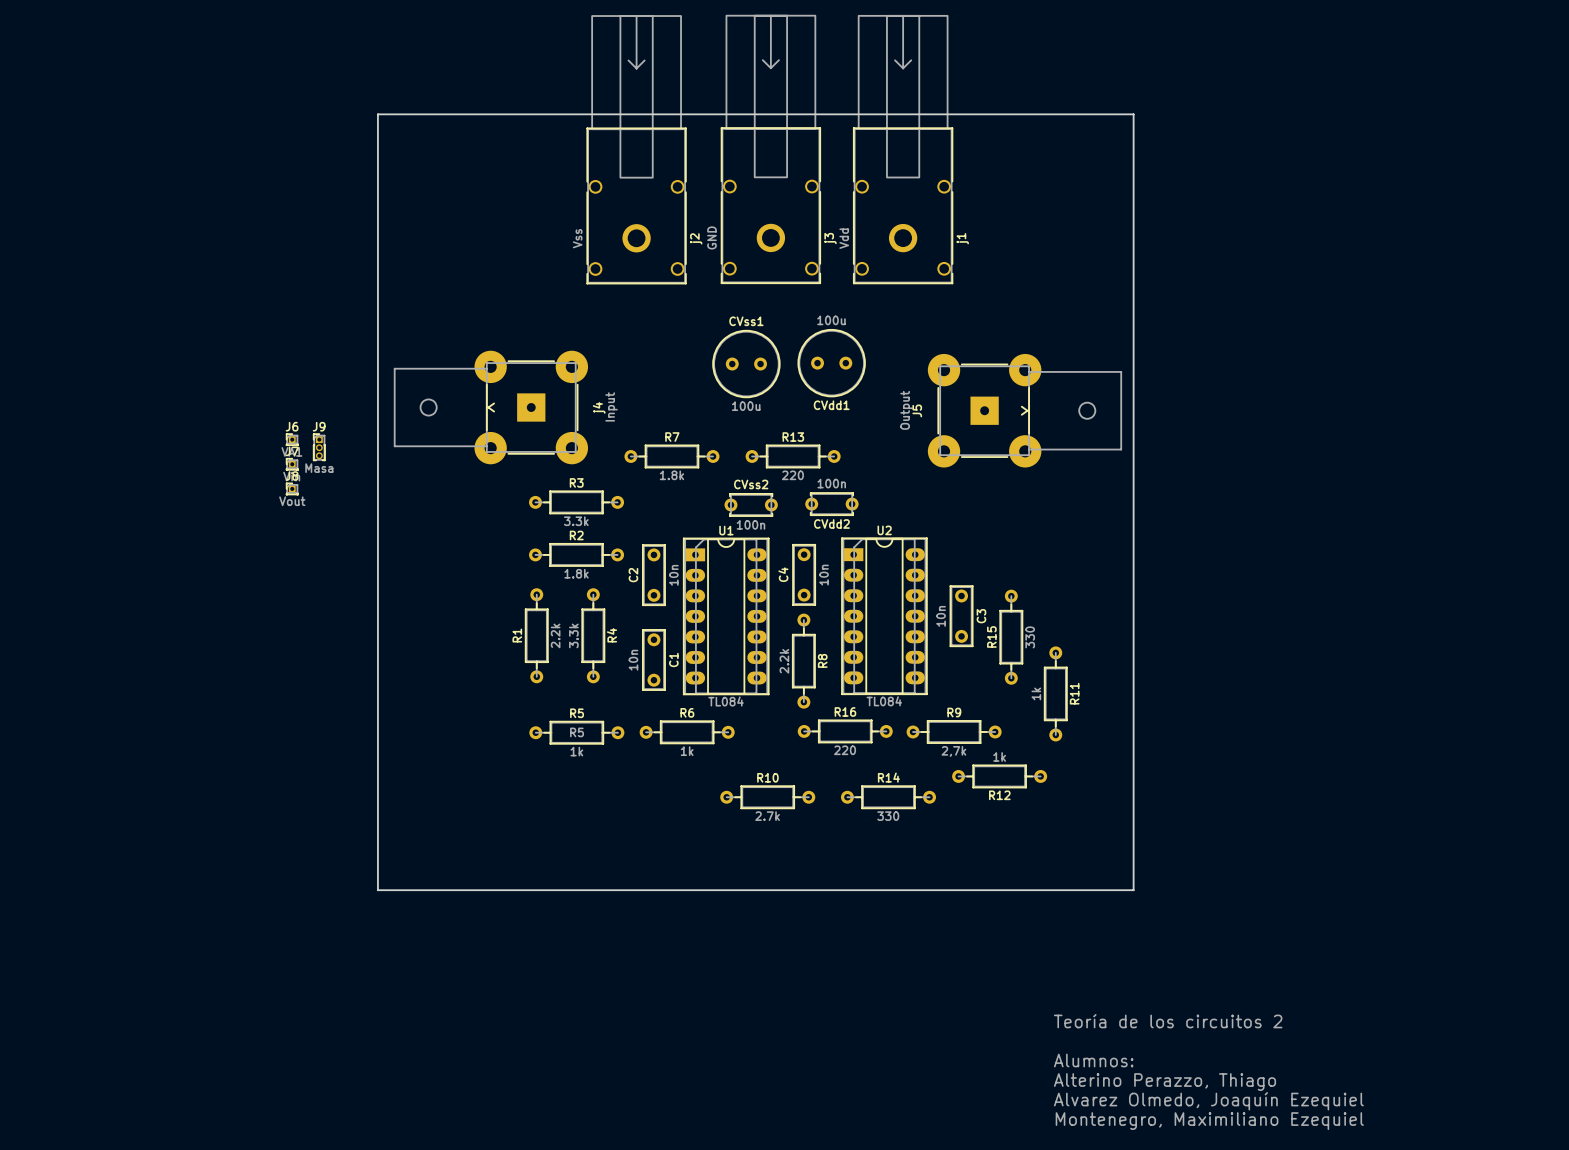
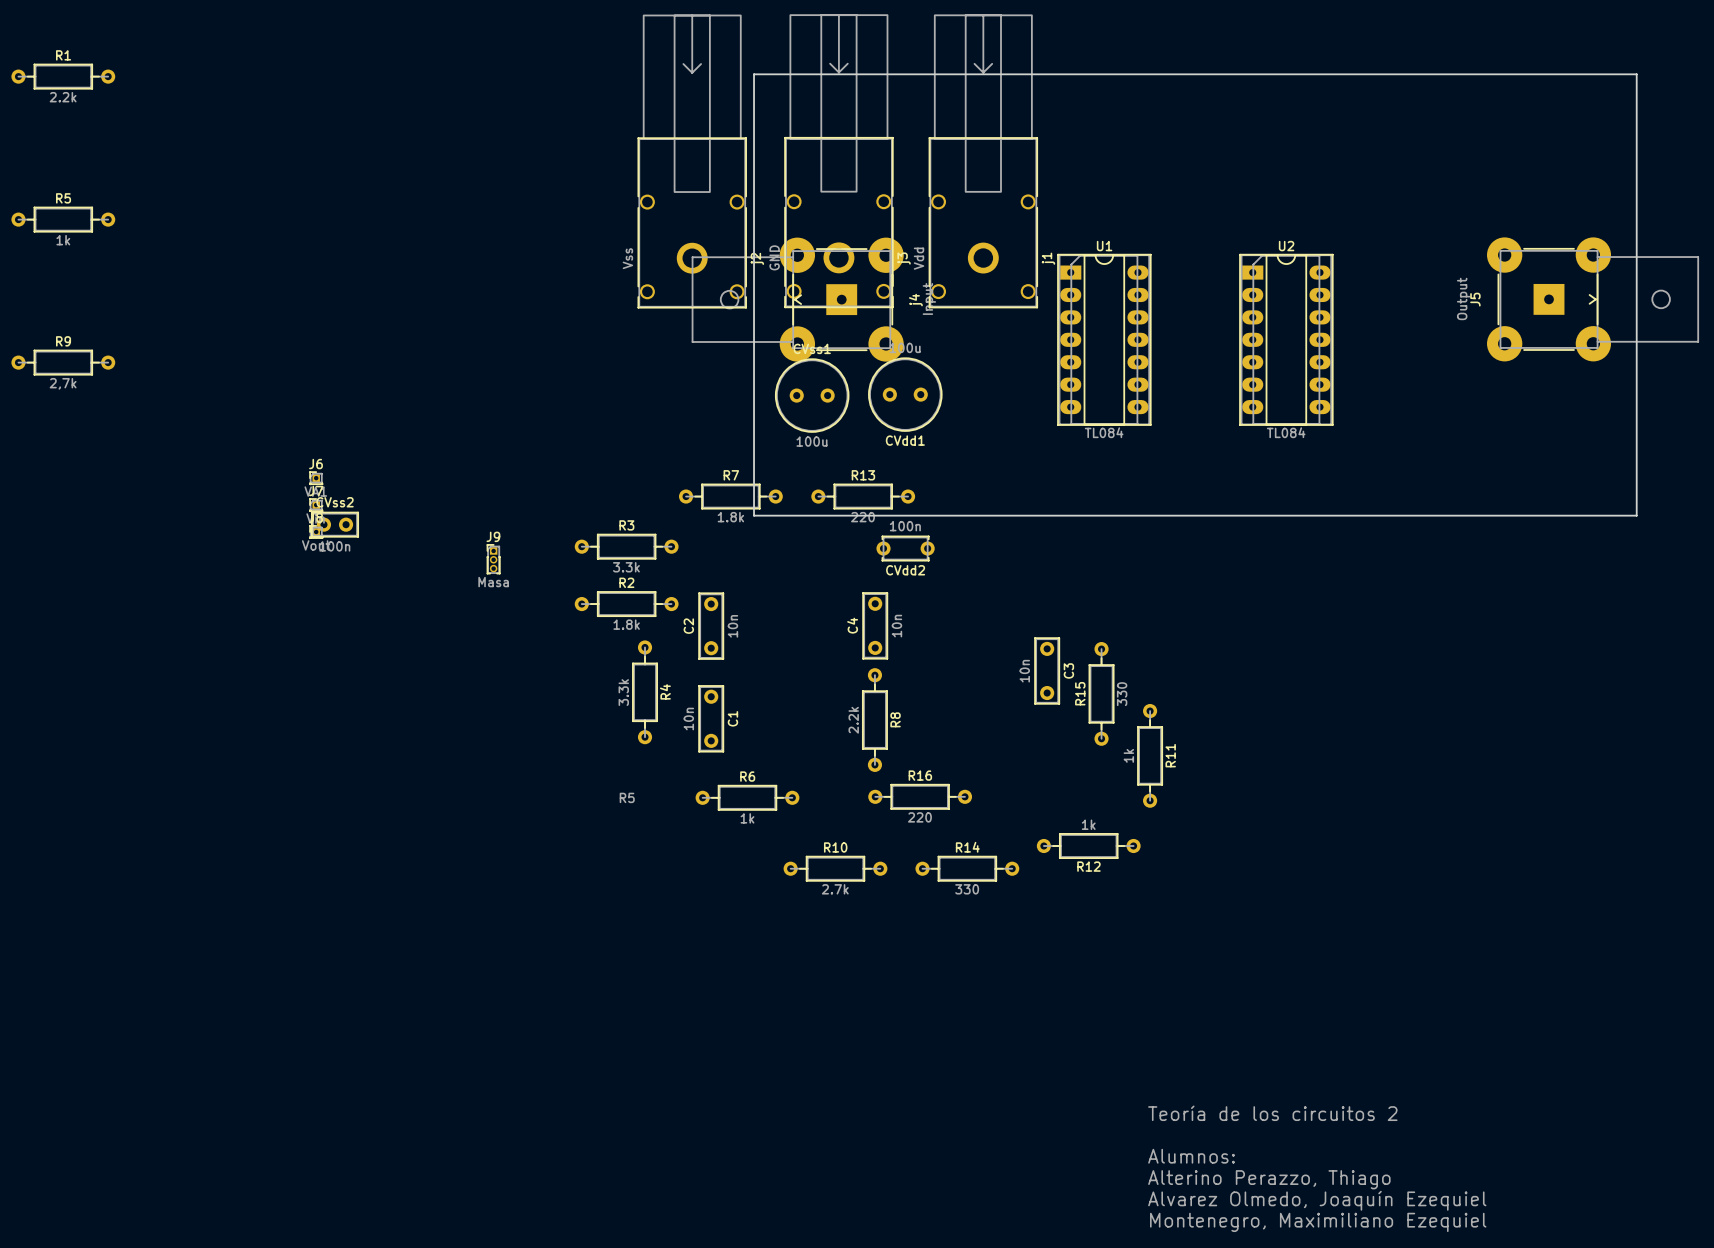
board edge: none -> (754, 74) (1636, 74) (1636, 515) (754, 515) (754, 74)
board edge: (377, 114) (1133, 114) (1133, 890) (377, 890) (377, 114) -> none
j4 position: (491, 407) -> (797, 299)
J5 position: (1024, 410) -> (1592, 299)
J9 position: (319, 447) -> (493, 559)
CVss2 footprint: [724, 493, 778, 517] -> [311, 512, 359, 538]
U1 position: (726, 616) -> (1104, 339)
U2 position: (884, 616) -> (1286, 339)
R1 rotation: 0° (536, 635) -> 90° clockwise (63, 76)
R1 position: (536, 635) -> (63, 76)
R5 position: (576, 732) -> (63, 219)
R9 position: (954, 732) -> (63, 362)

